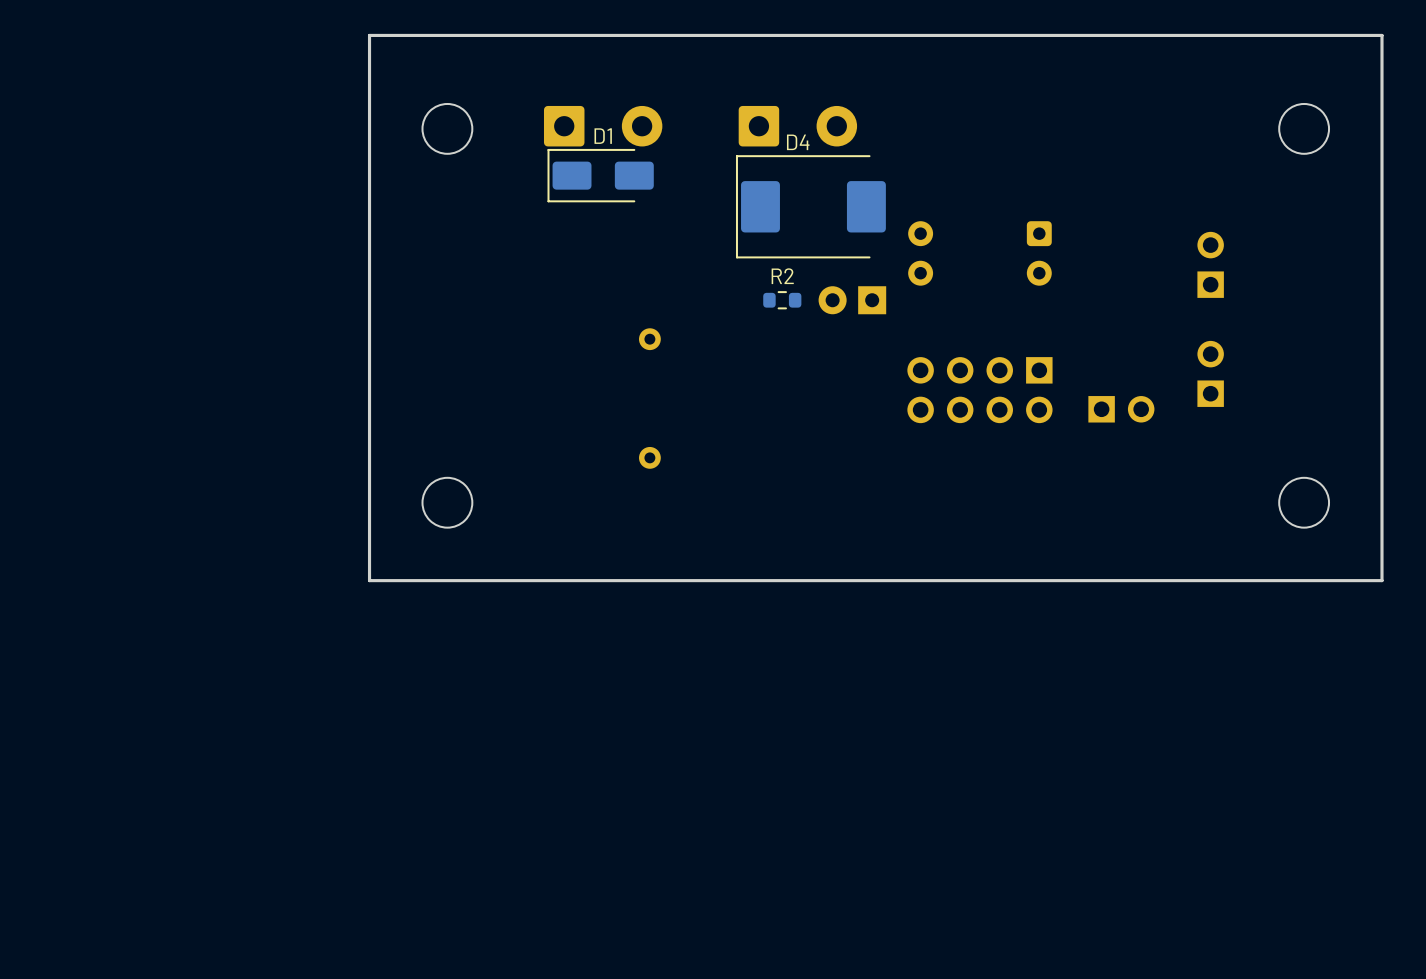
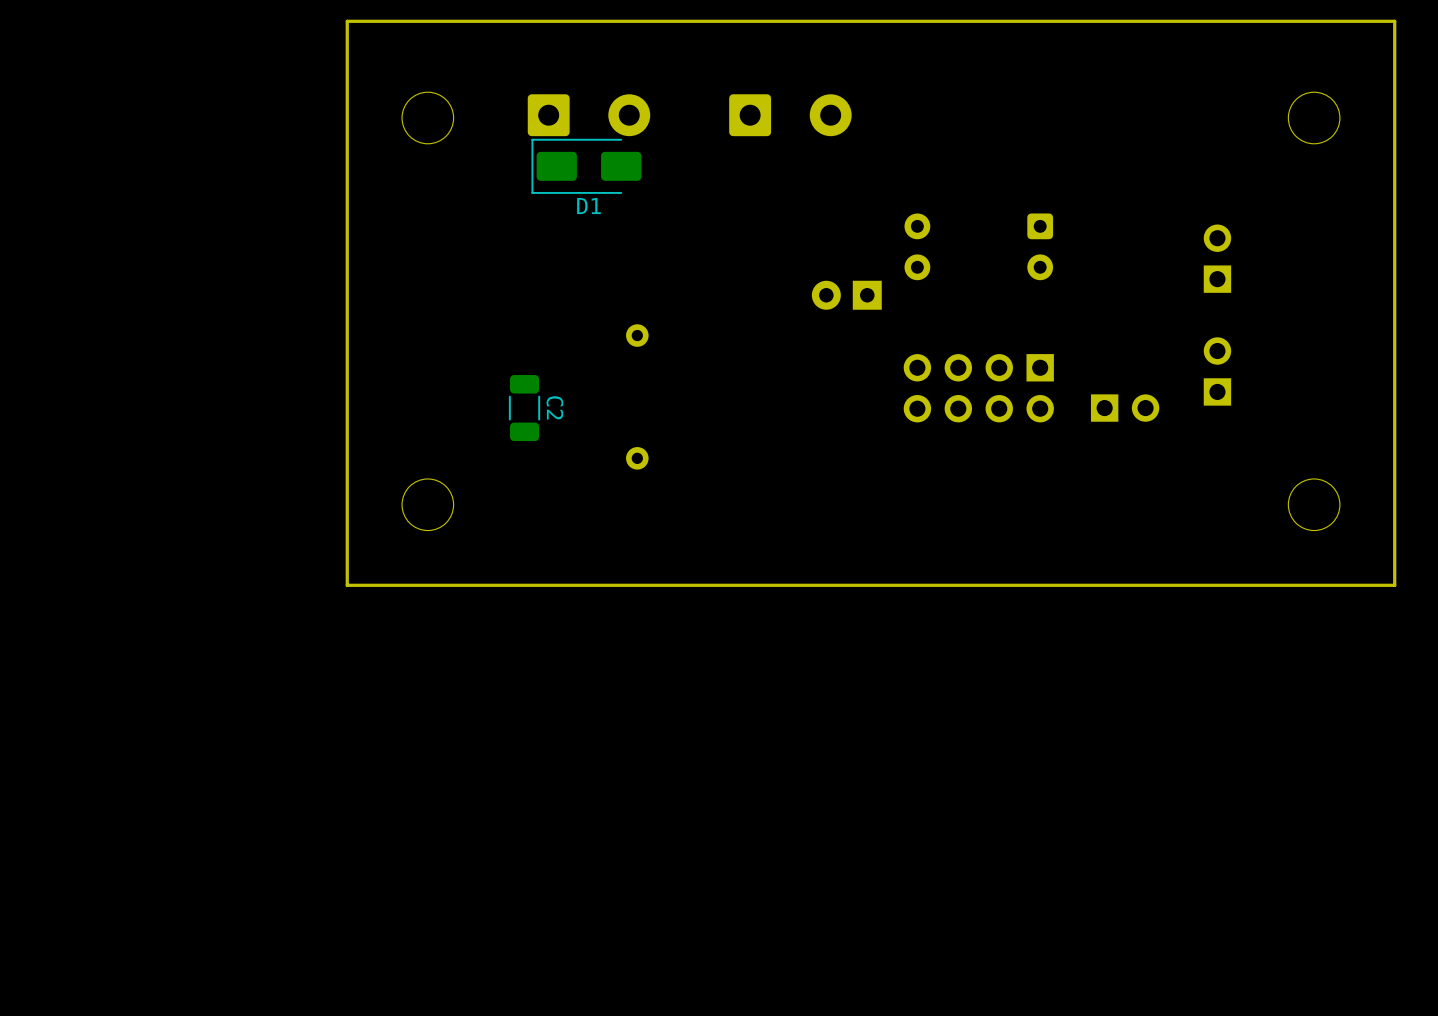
D1 name position: D1 (603, 136) -> D1 (588, 206)
D4: (810, 206) -> none
R2: (782, 300) -> none
C2: none -> (524, 408)

